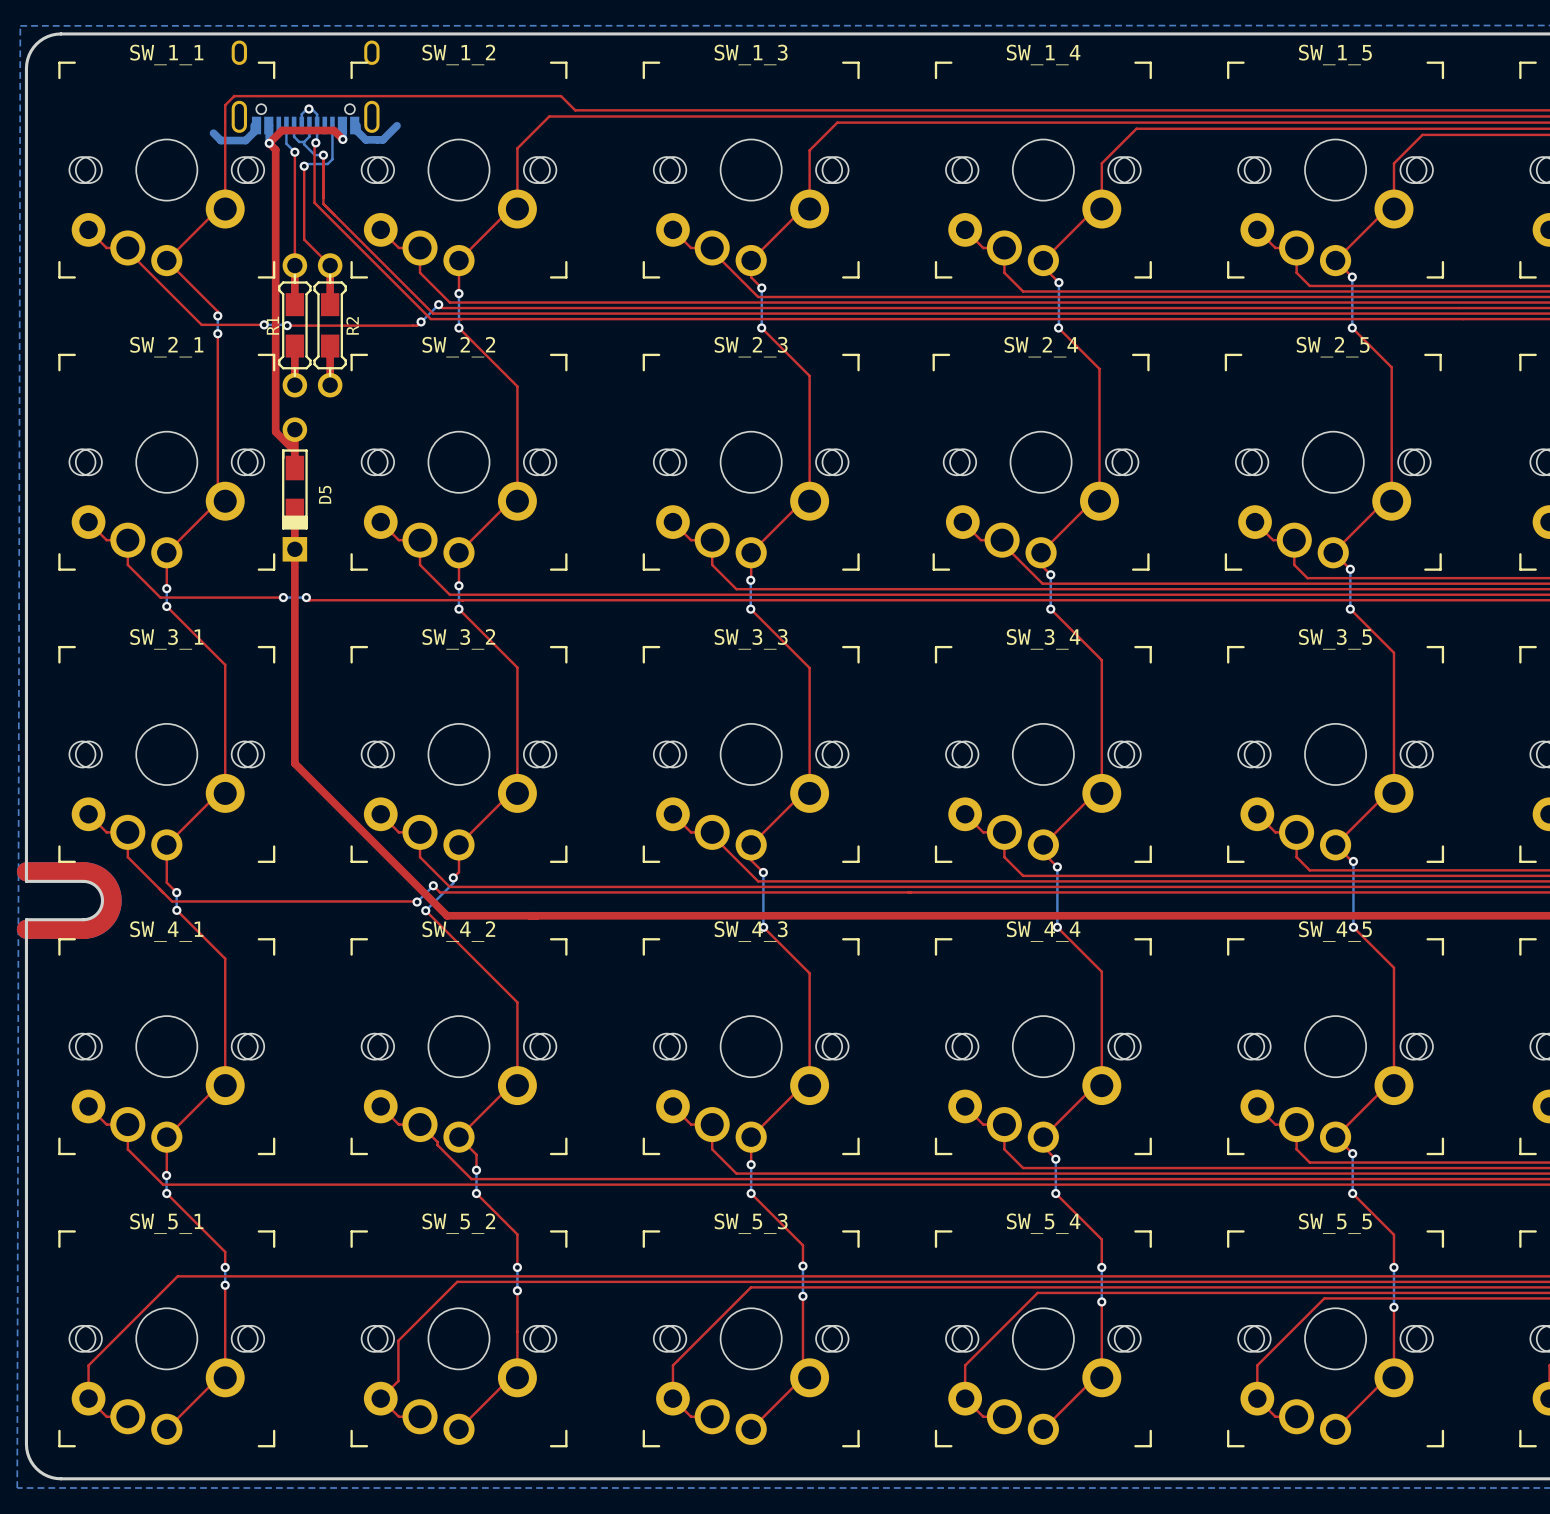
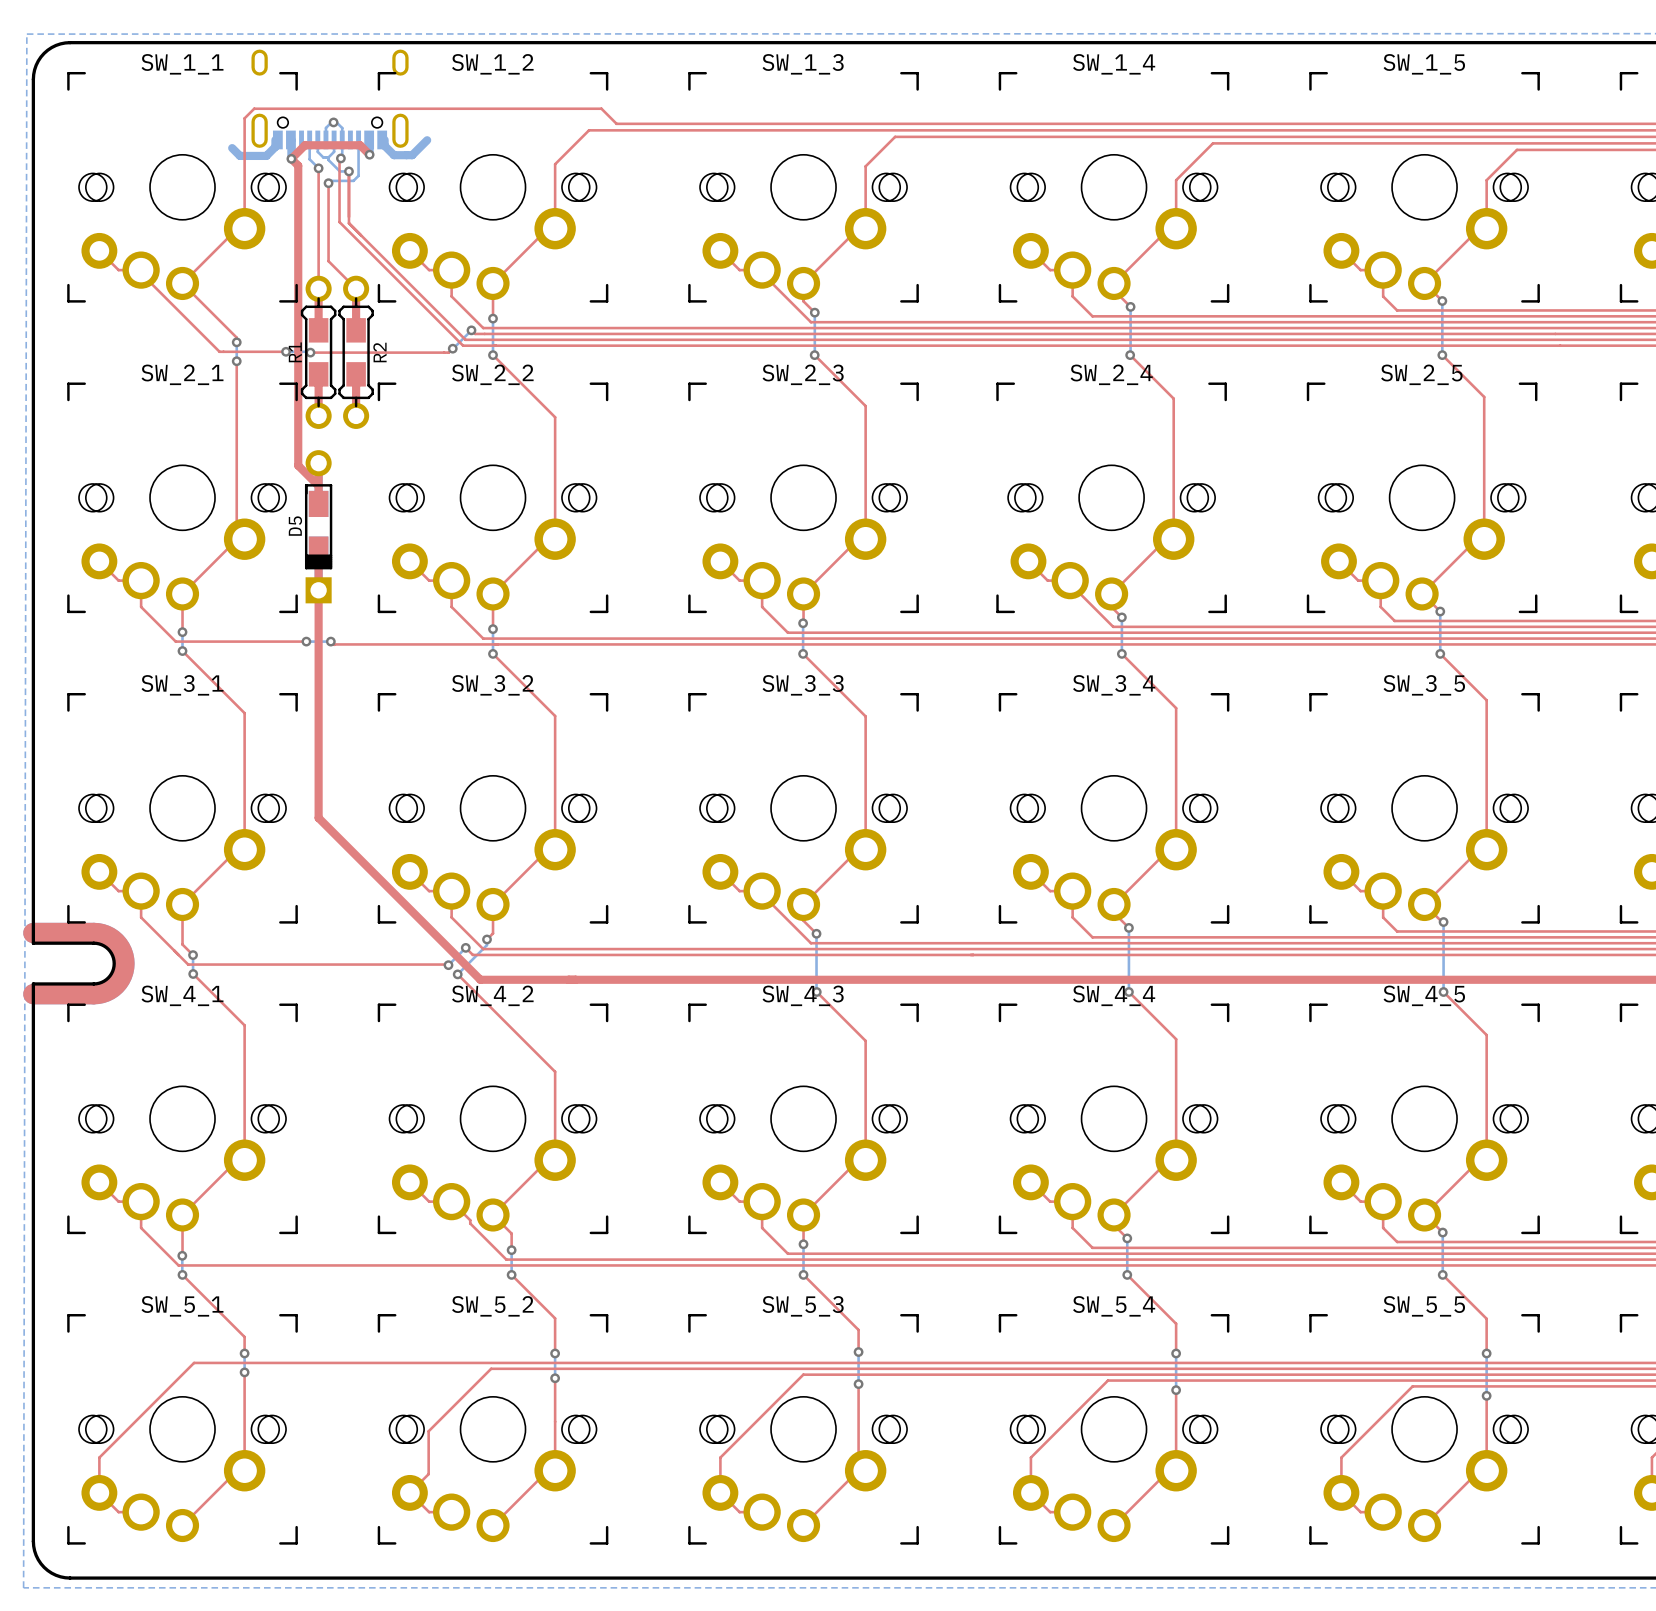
D5 footprint: [282, 417, 308, 562] -> [304, 450, 333, 604]
D5 name position: D5 (325, 494) -> D5 (295, 526)

